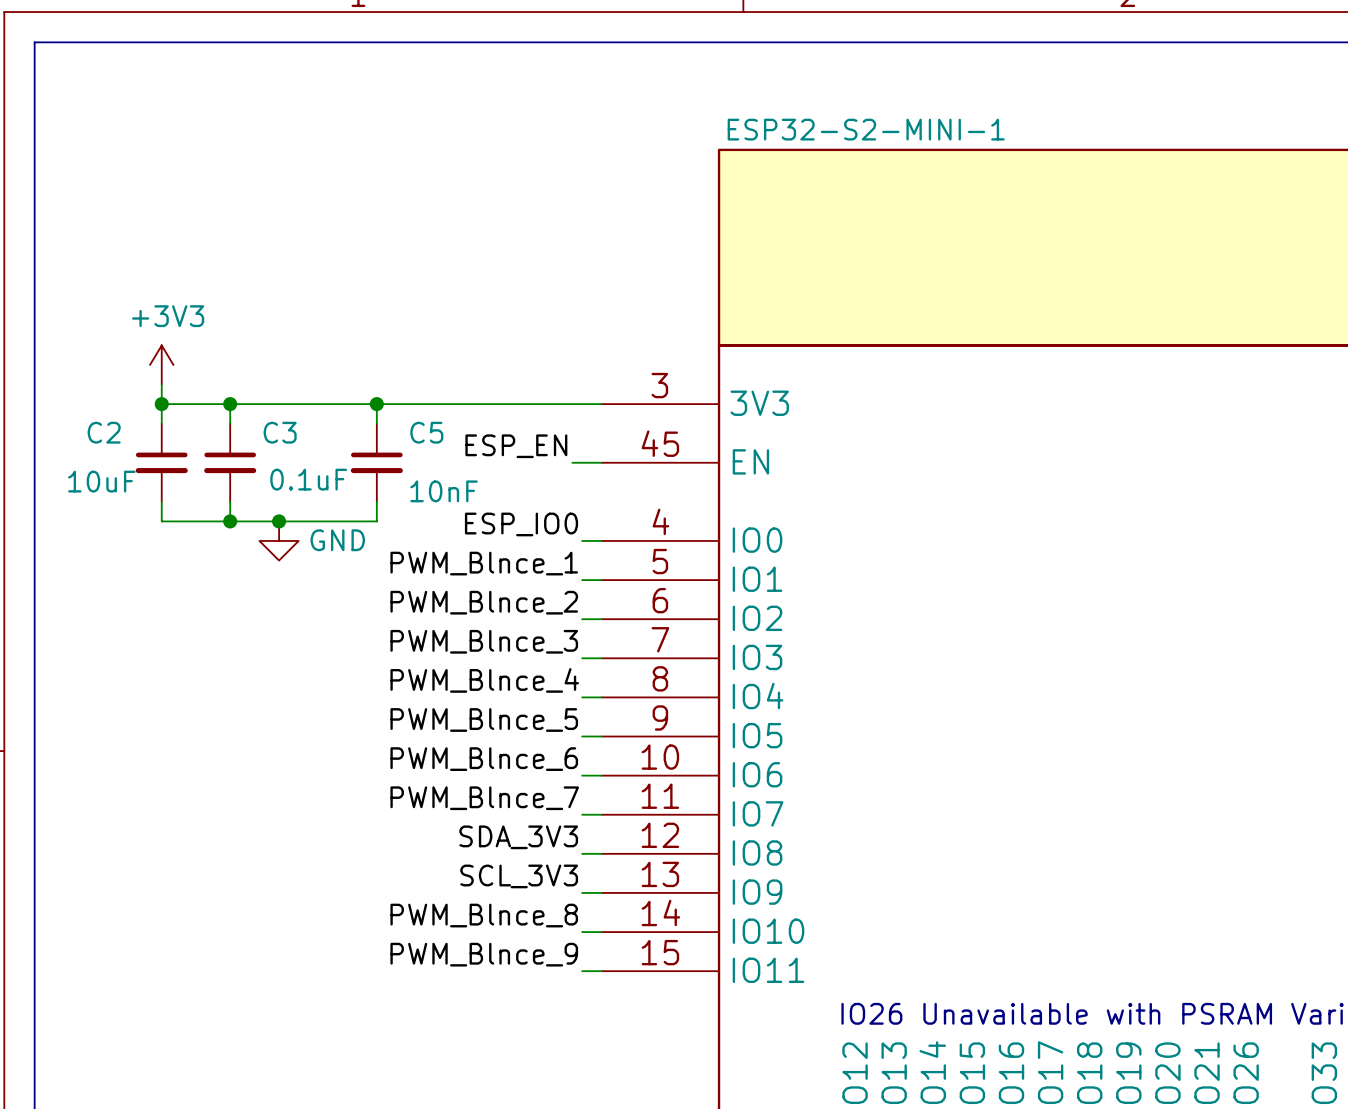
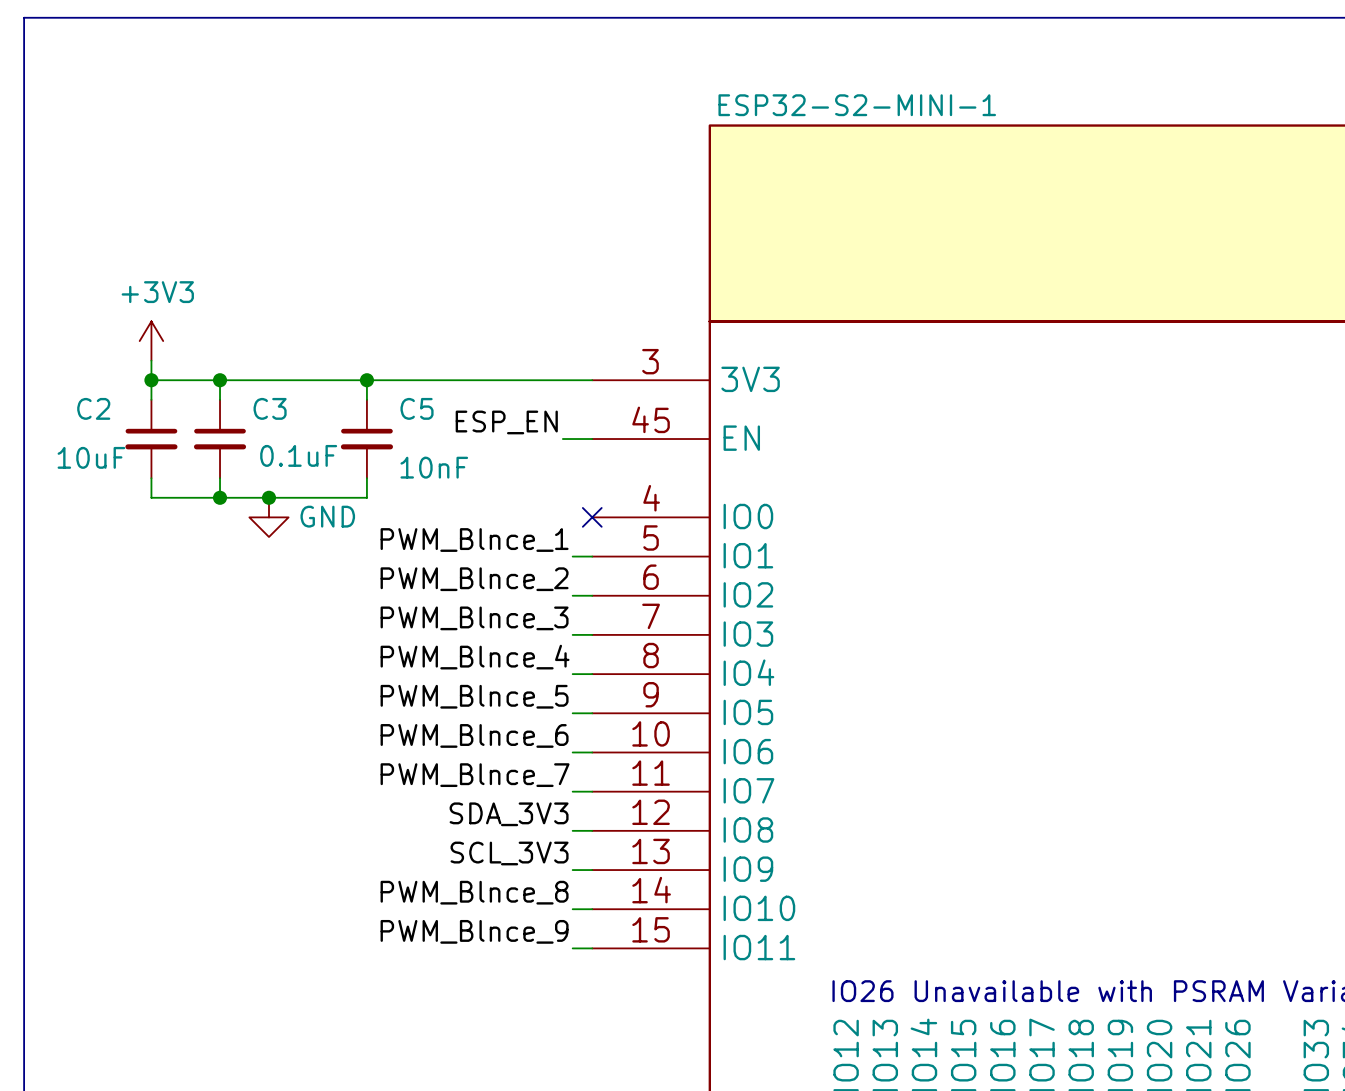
label: ESP_IO0 (521, 524) -> none
wire: (582, 540) (601, 540) -> none
no-connect mark: none -> (592, 517)

